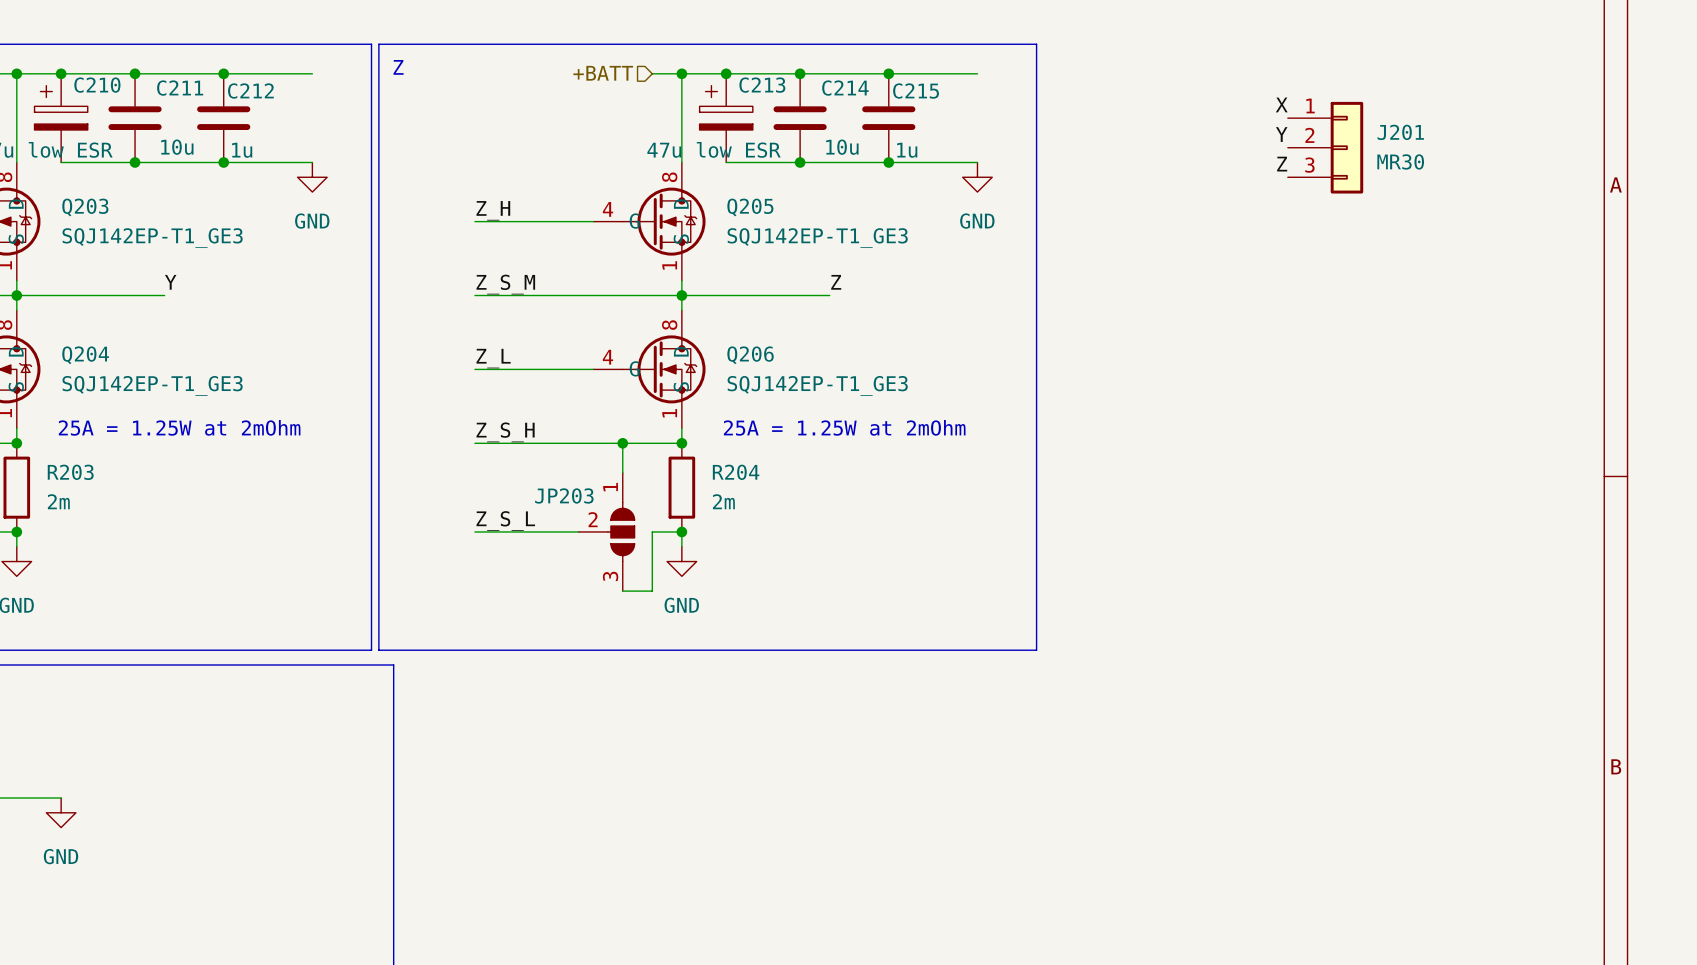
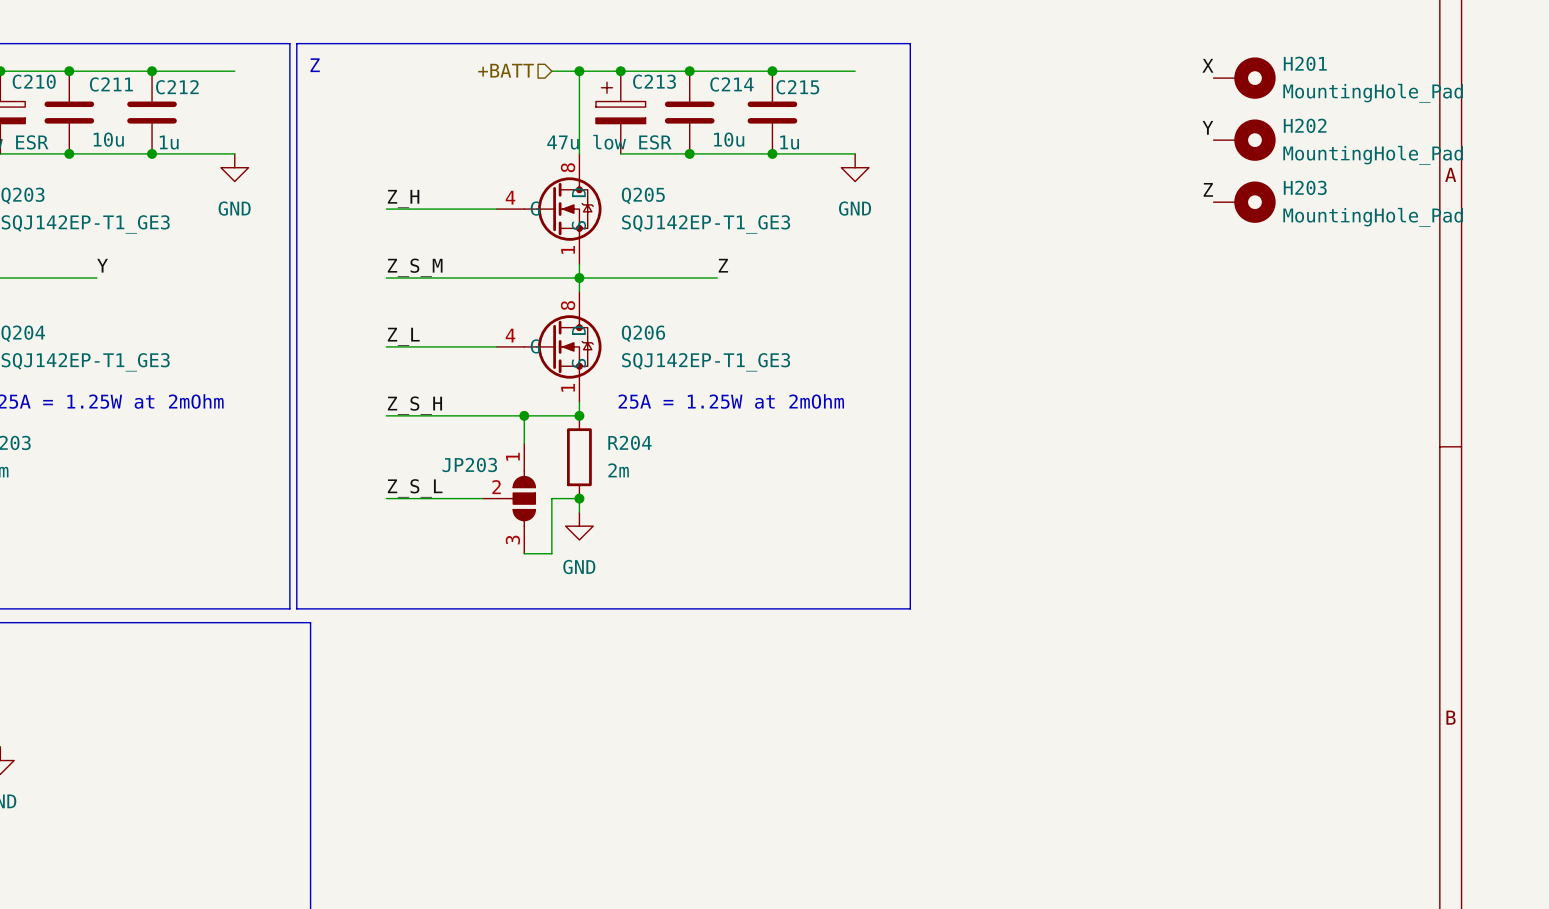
H201: none -> MountingHole_Pad (1244, 78)
label position: X (1281, 104) -> X (1207, 65)
label position: Y (1281, 134) -> Y (1207, 127)
J201: MR30 (1325, 147) -> none
H202: none -> MountingHole_Pad (1244, 140)
label position: Z (1282, 164) -> Z (1208, 189)
H203: none -> MountingHole_Pad (1244, 202)

